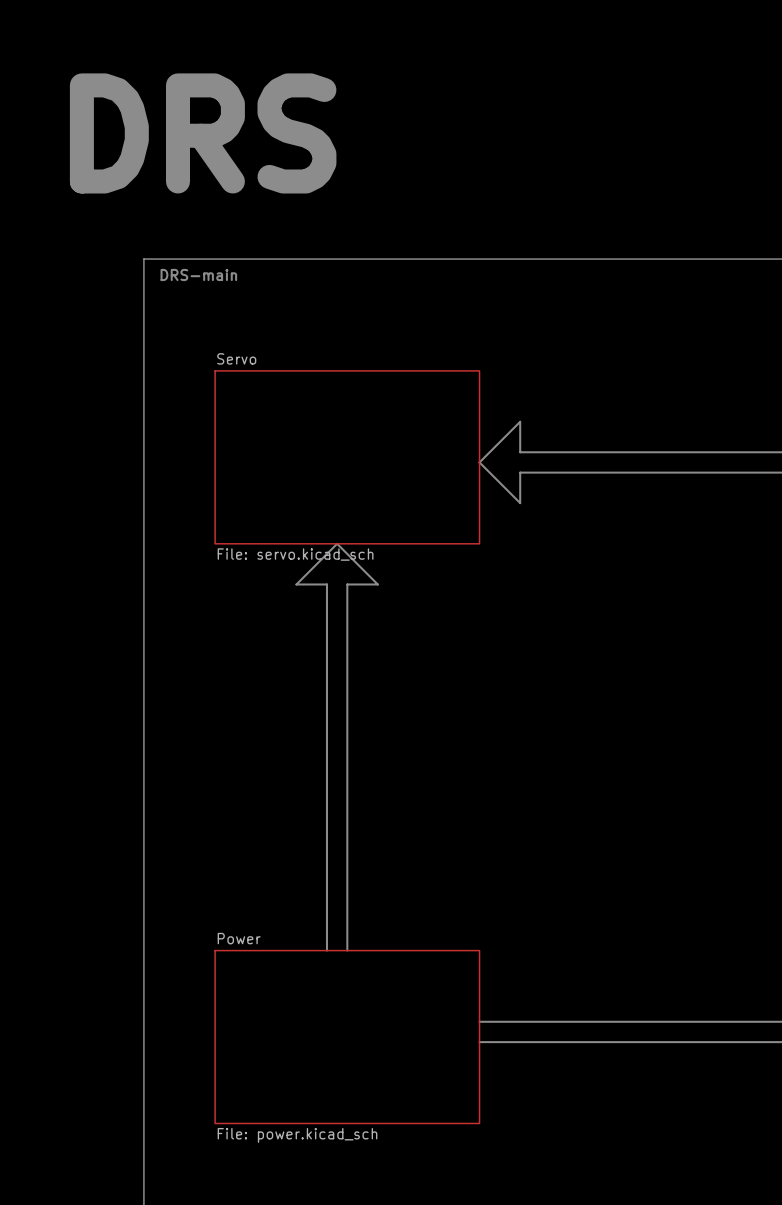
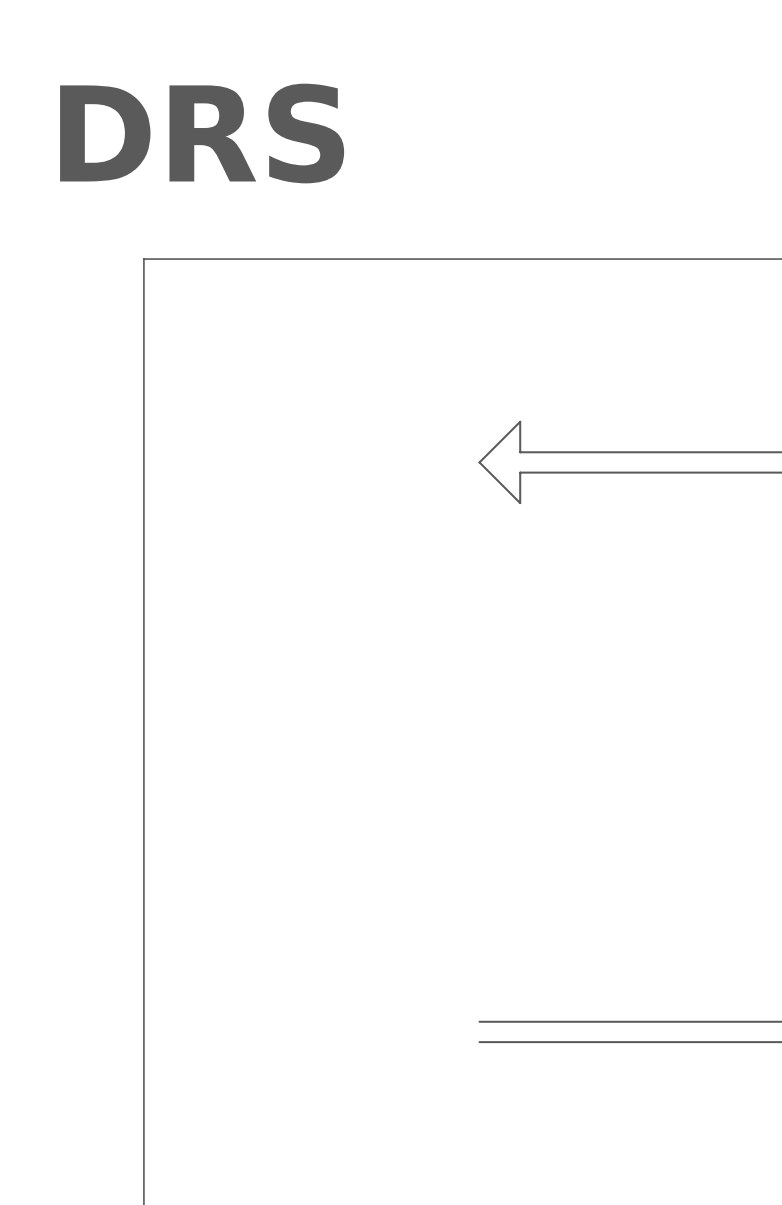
text: DRS-main (198, 274) -> none
sheet Servo: File: servo.kicad_sch (347, 457) -> none
line: (326, 950) (326, 584) (296, 584) (337, 543) (377, 584) (347, 584) (347, 950) -> none
sheet Power: File: power.kicad_sch (347, 1037) -> none

